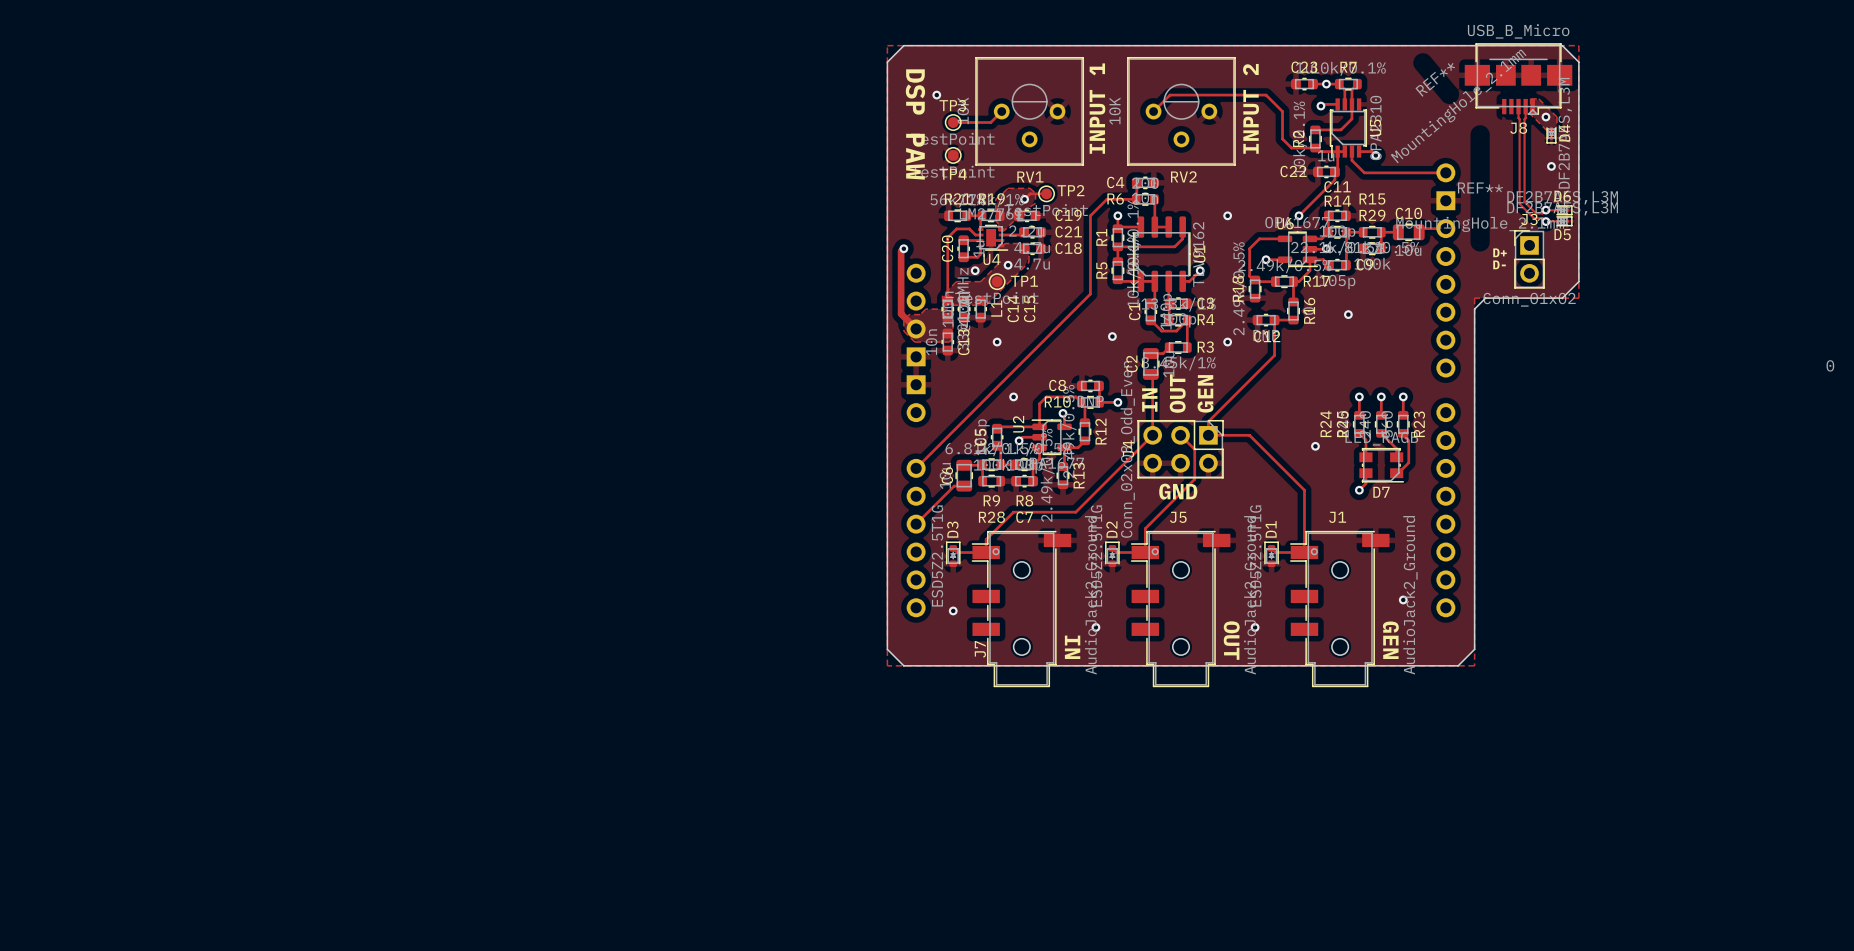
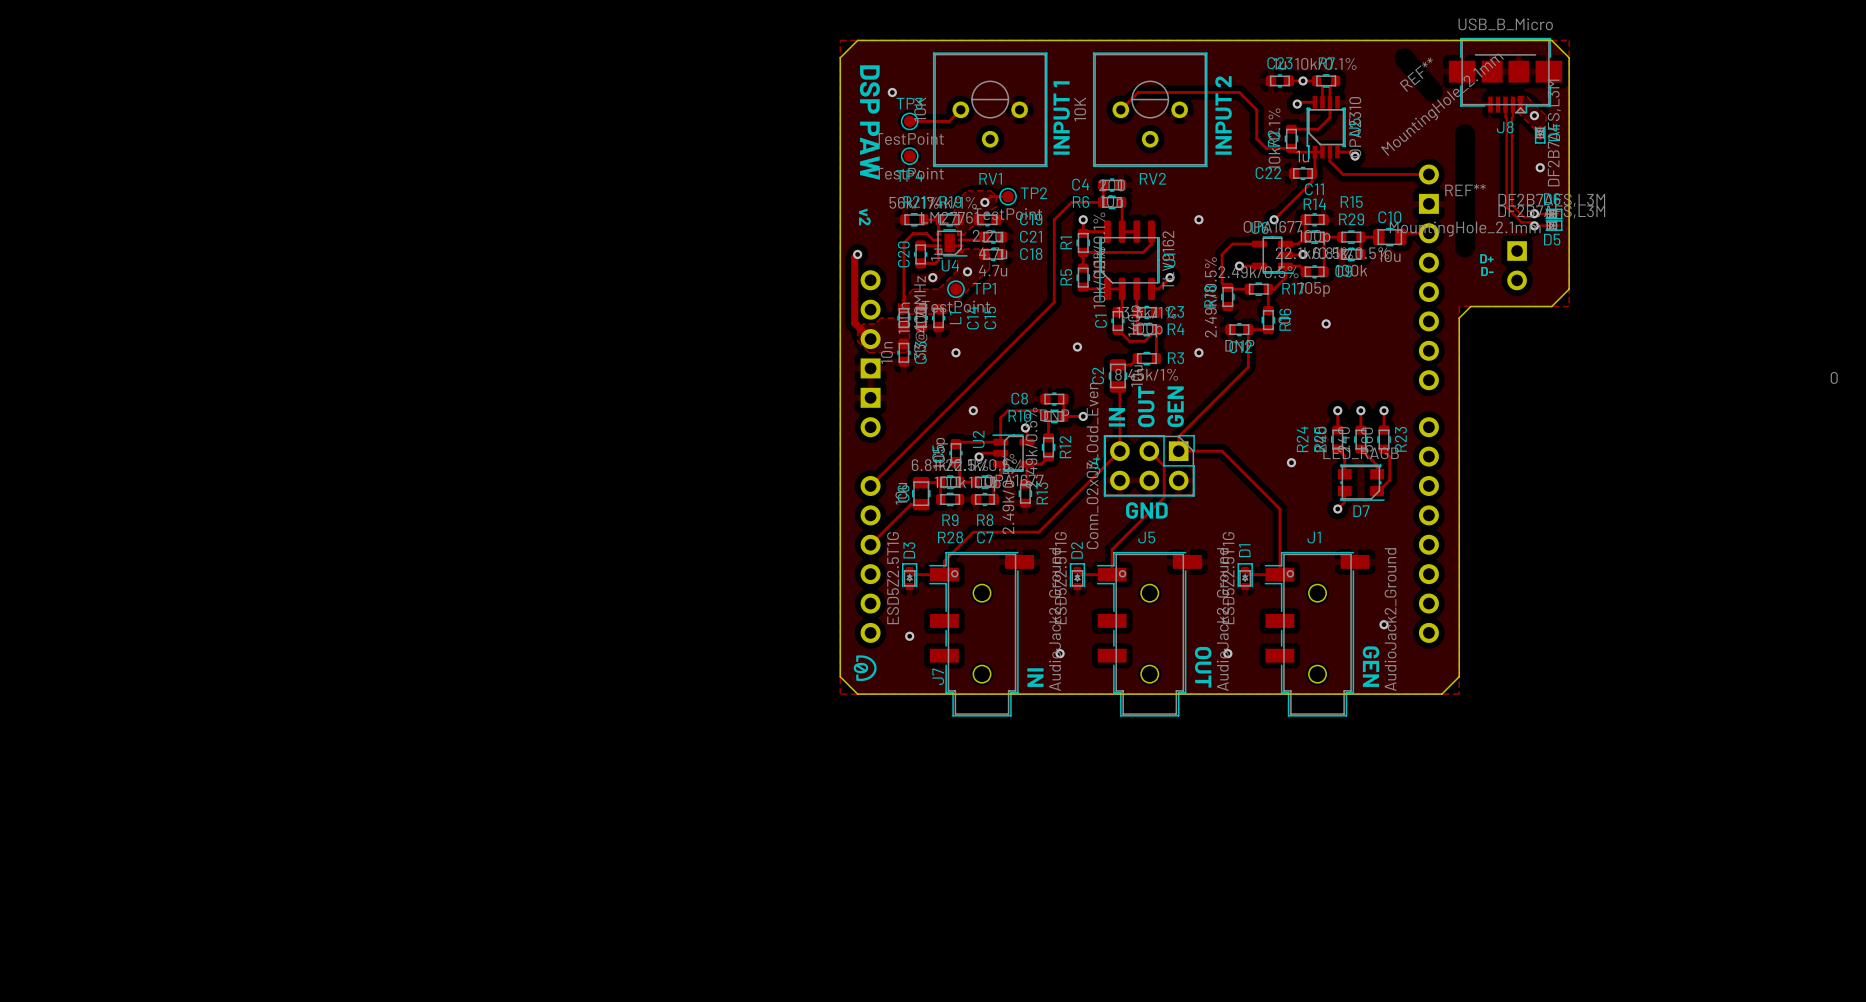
text: none -> v2 (864, 216)
J3 side: top (1529, 259) -> bottom (1517, 265)
drawing: none -> [853, 655, 877, 681]

